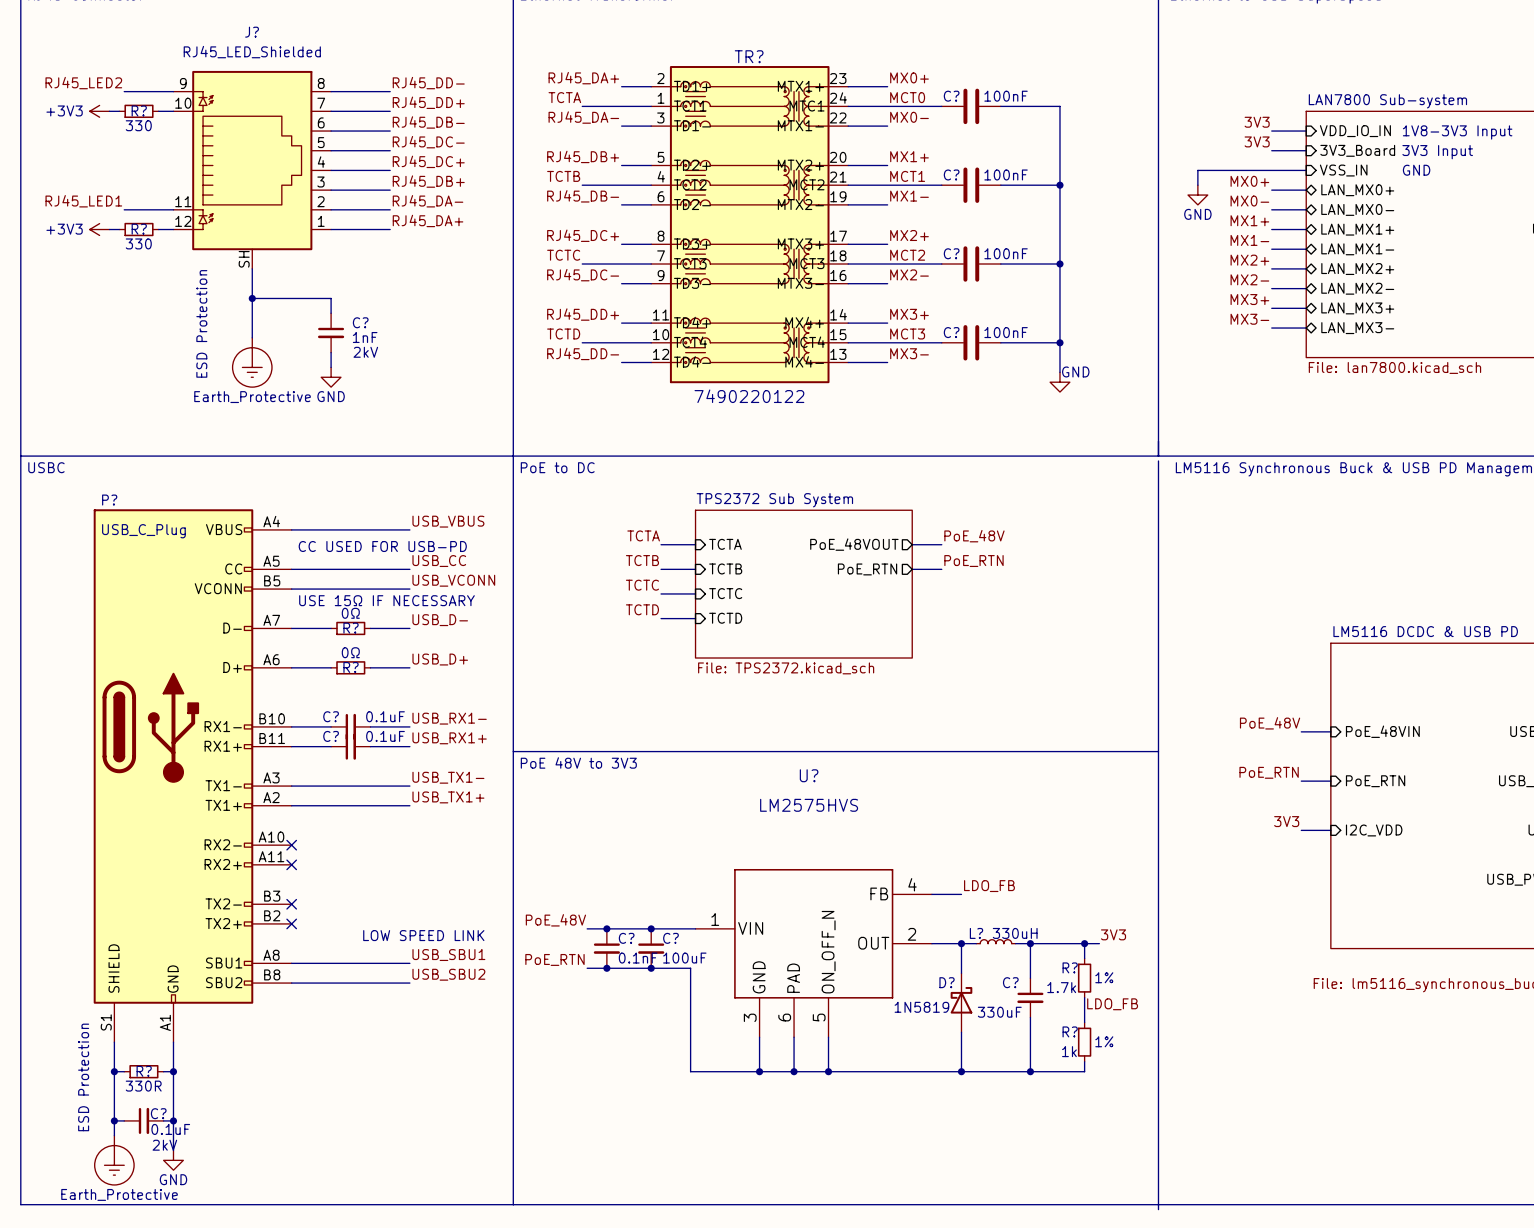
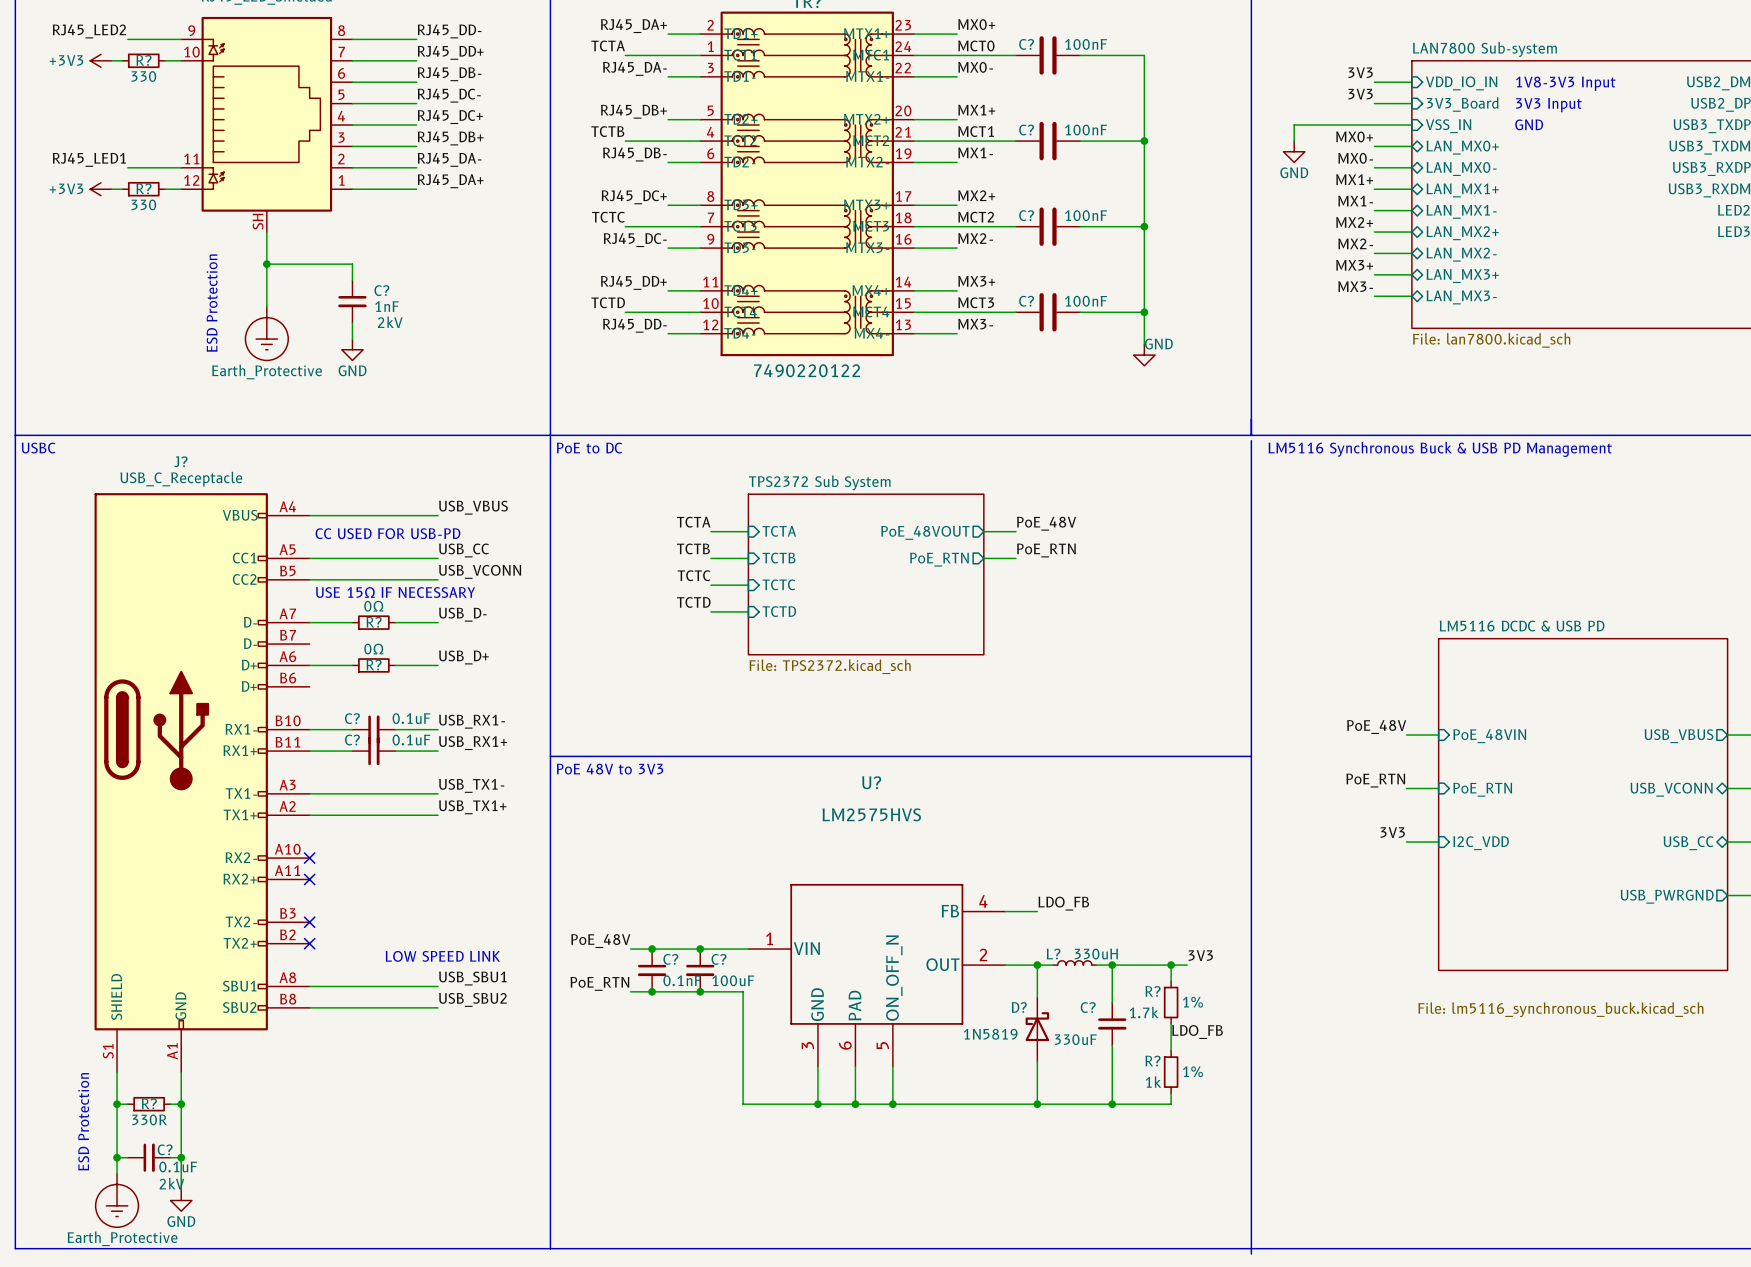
P?: USB_C_Plug (192, 775) -> none
J?: none -> USB_C_Receptacle (202, 782)

